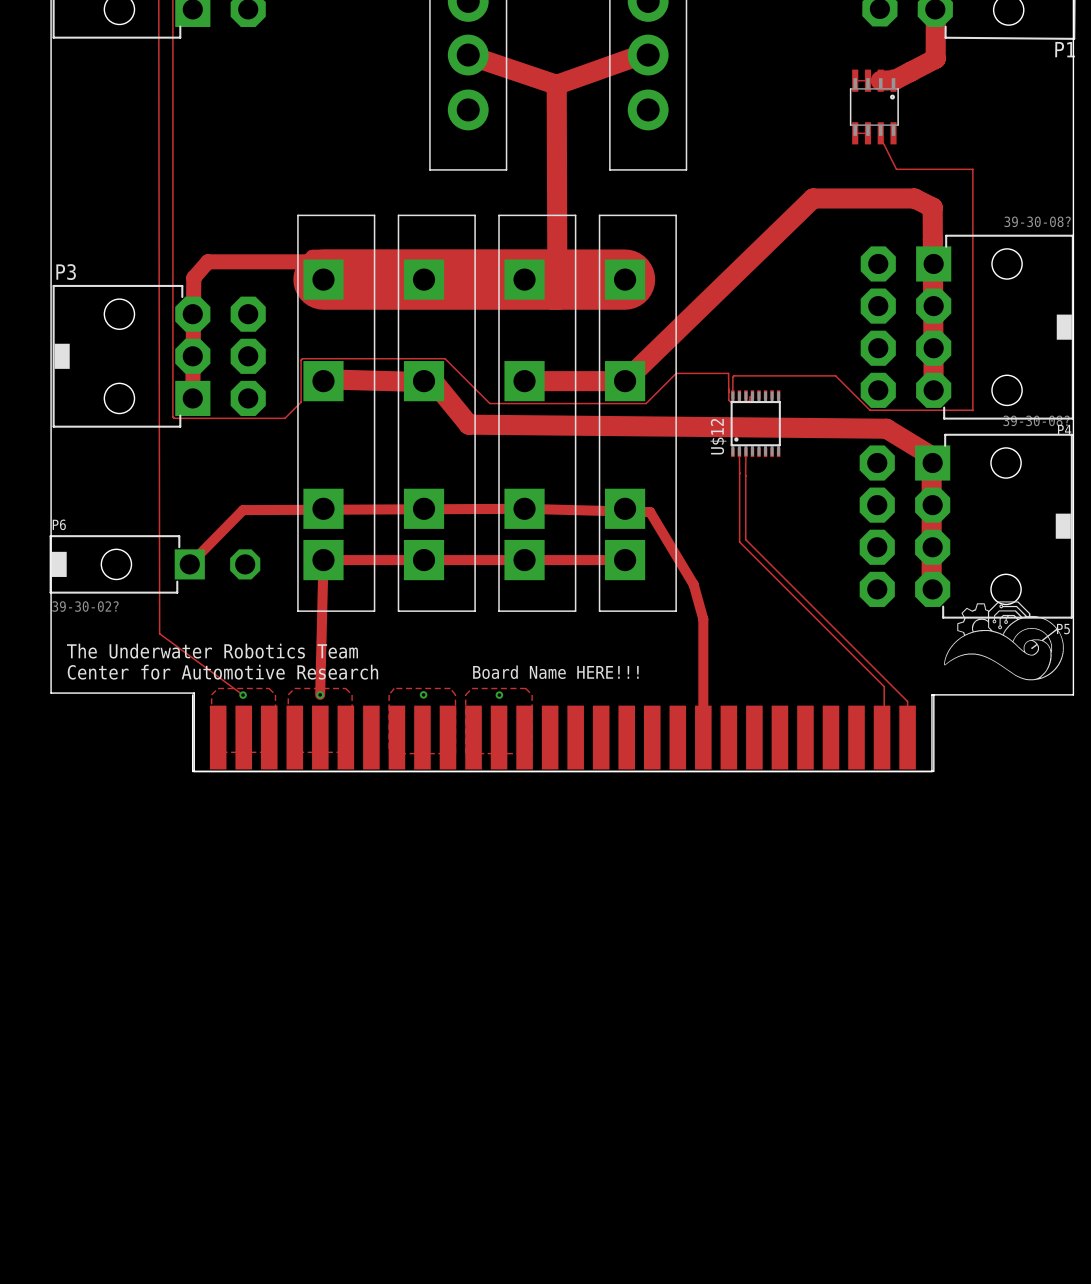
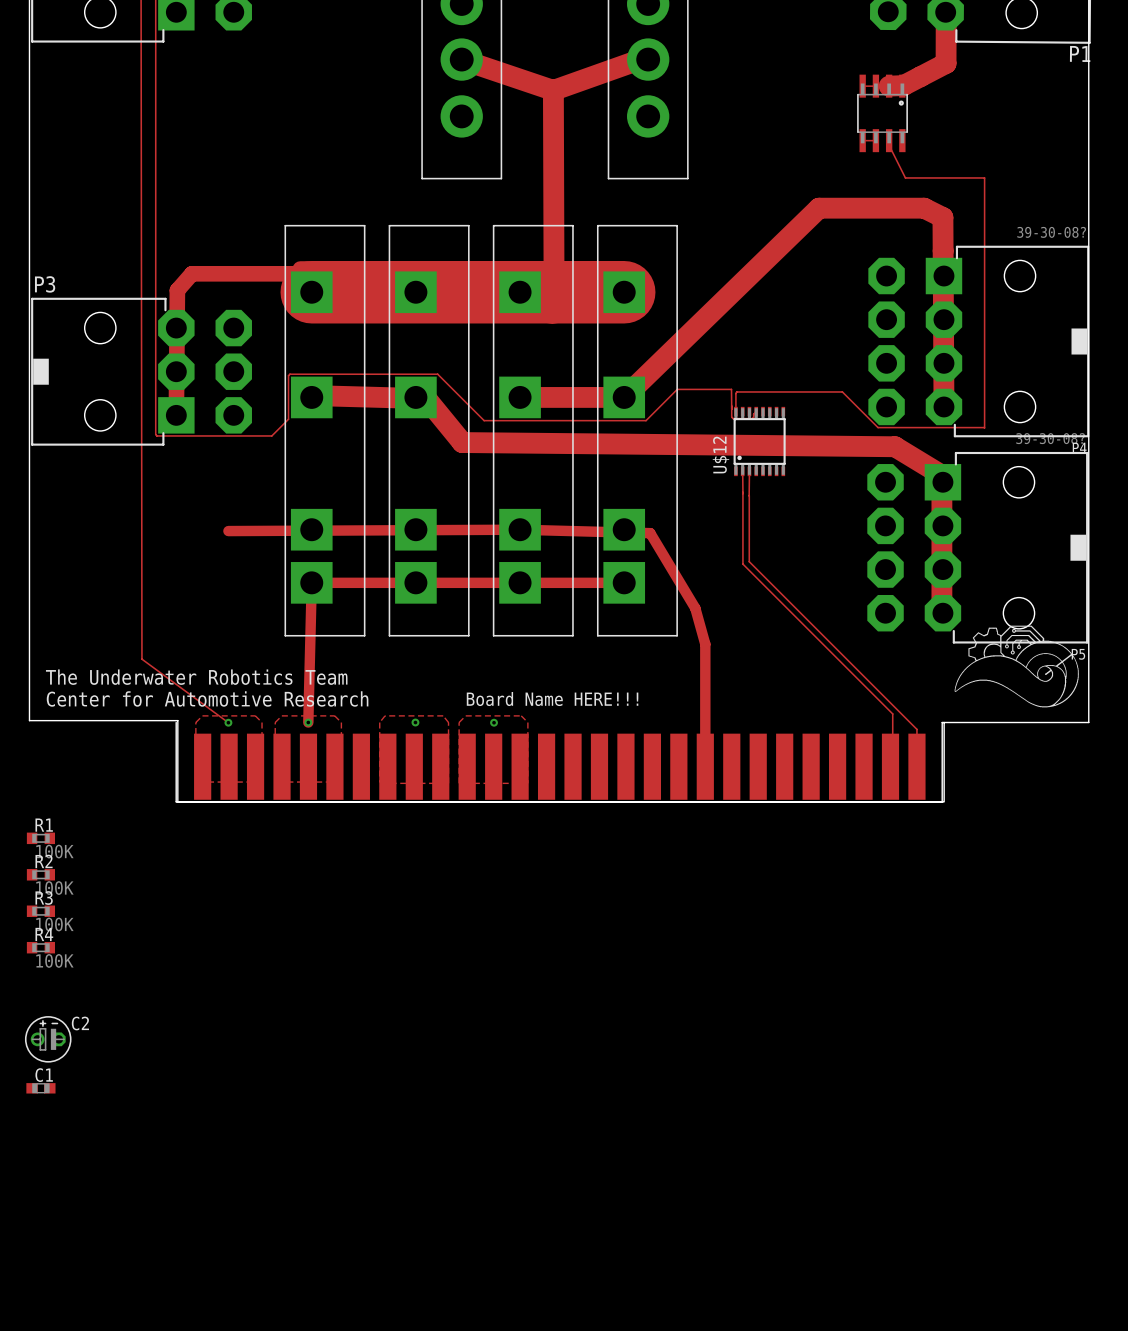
track: (243, 510) (189, 564) -> none
P6: 39-30-02? (154, 564) -> none
R1: none -> 100K (40, 838)
R2: none -> 100K (40, 874)
R3: none -> 100K (40, 911)
R4: none -> 100K (40, 947)
C2: none -> (48, 1039)
C1: none -> (40, 1088)

